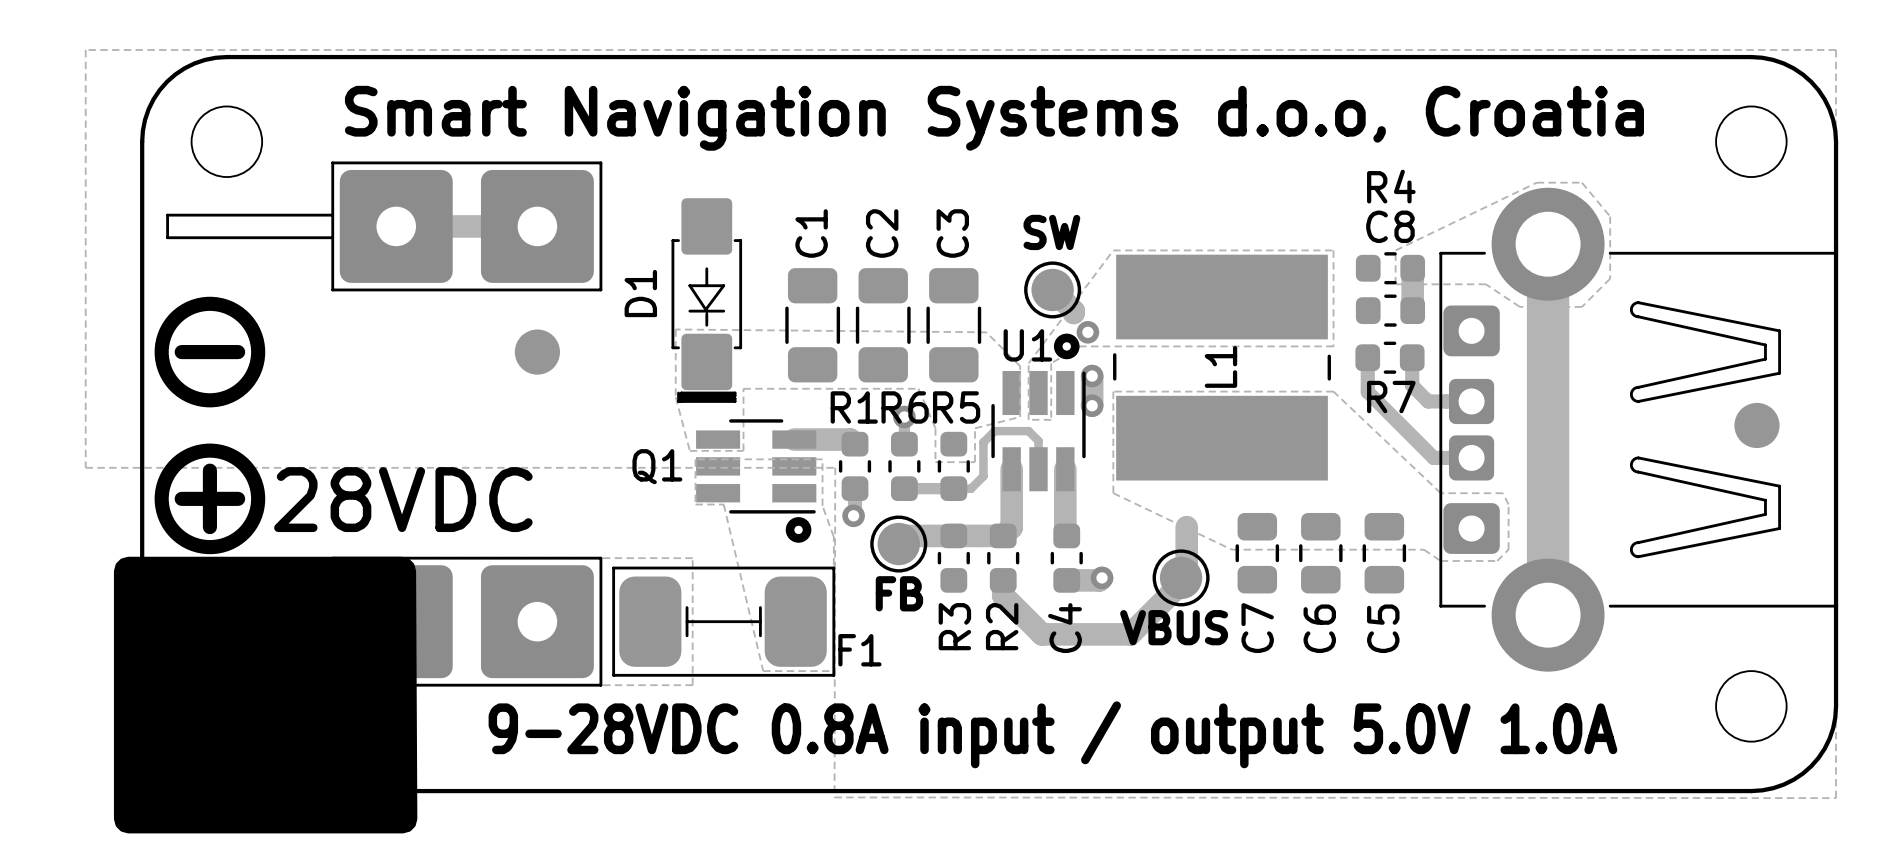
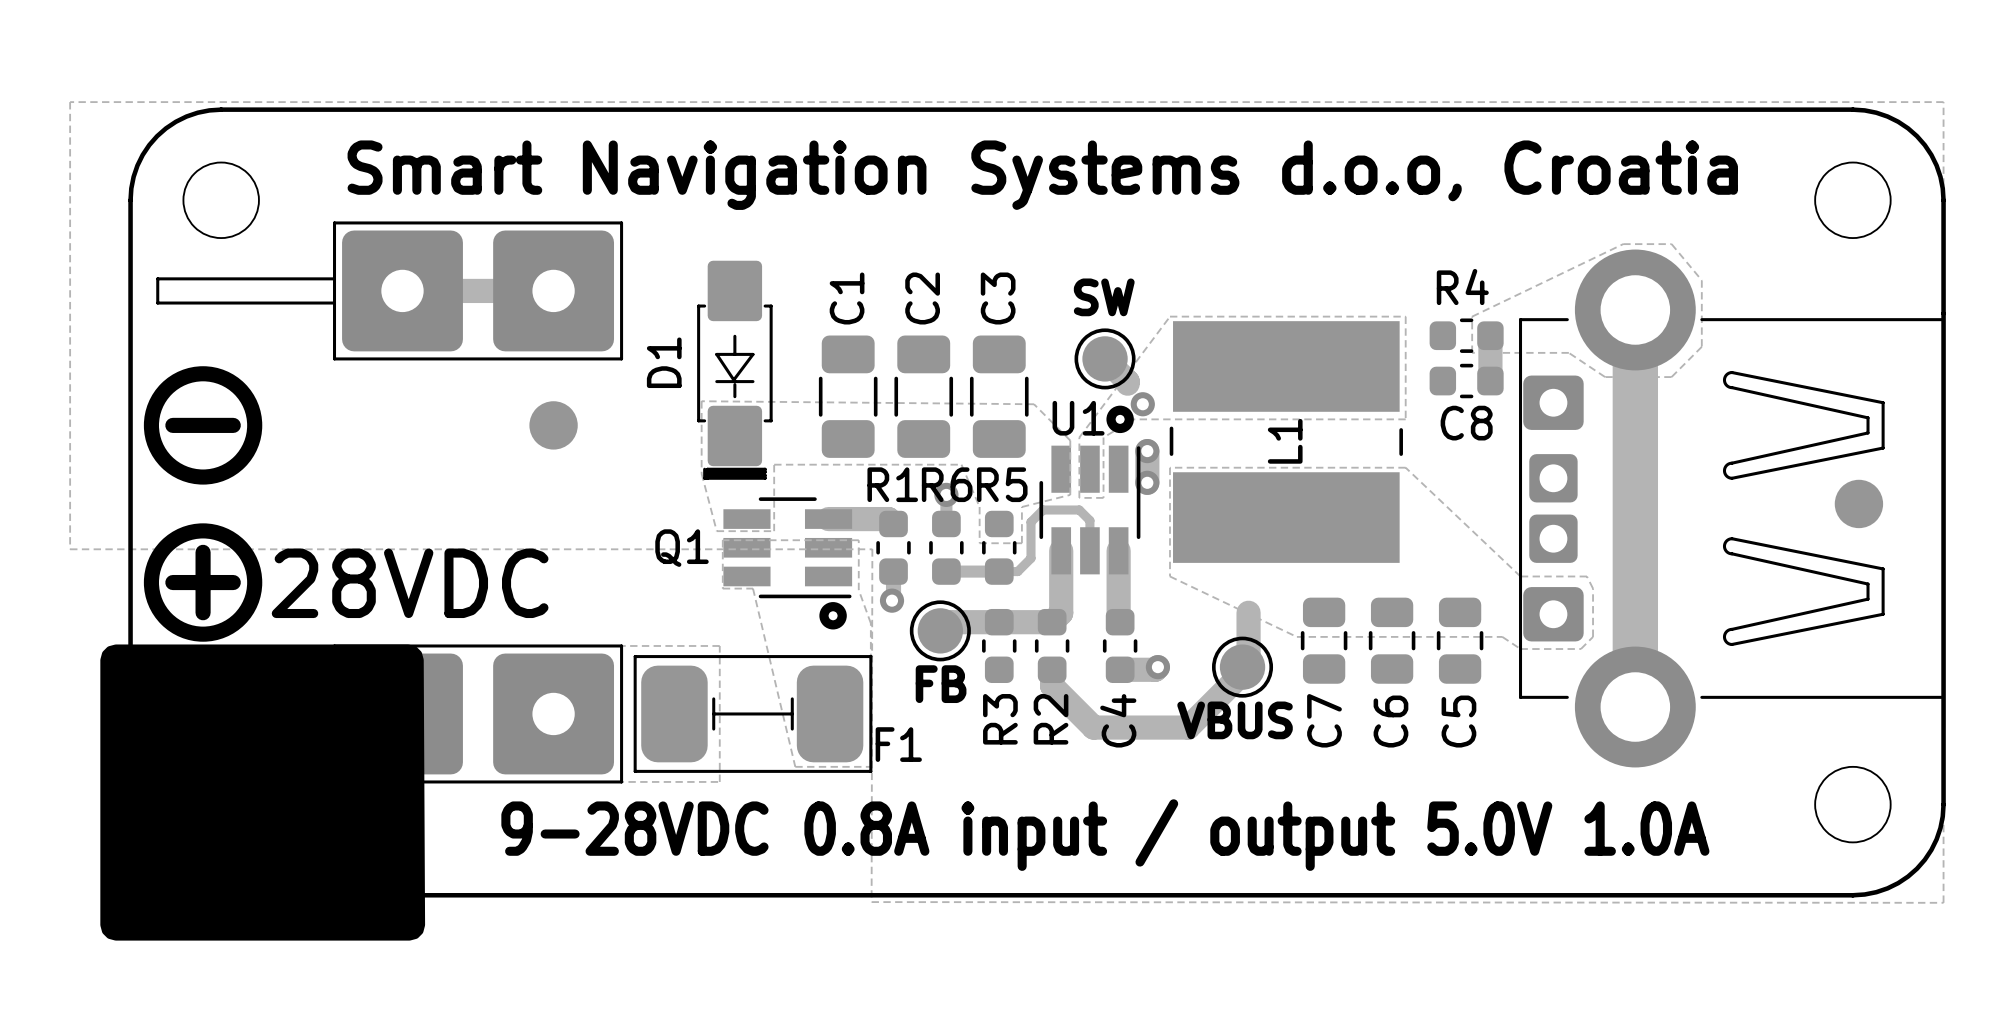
R4 name position: R4 (1391, 186) -> R4 (1462, 287)
C8 name position: C8 (1390, 226) -> C8 (1466, 423)
track: (1367, 357) (1367, 391) (1433, 457) (1471, 457) -> none
R7: (1389, 357) -> none
track: (1412, 357) (1412, 385) (1428, 401) (1471, 401) -> none

